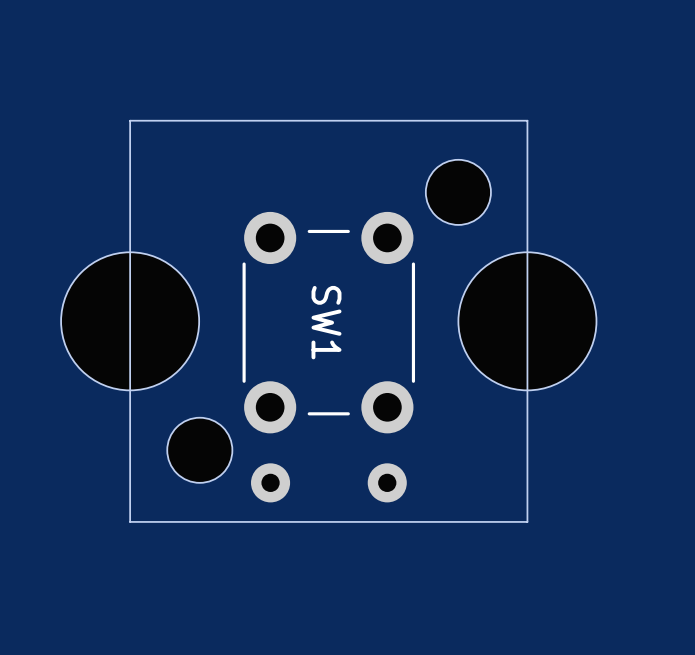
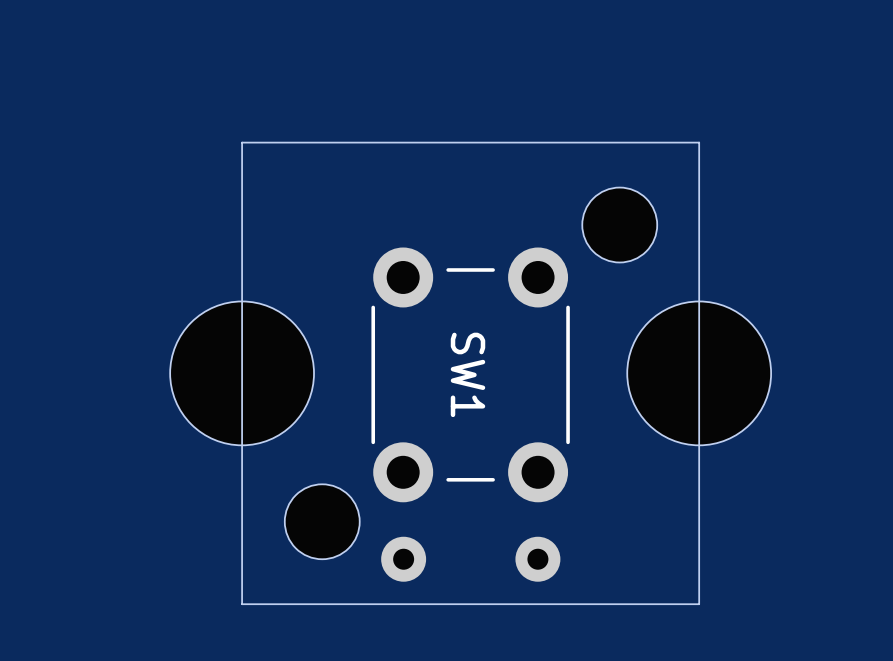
part footprint: [61, 252, 200, 391] -> [170, 301, 315, 446]
part footprint: [458, 252, 597, 391] -> [627, 301, 772, 446]

